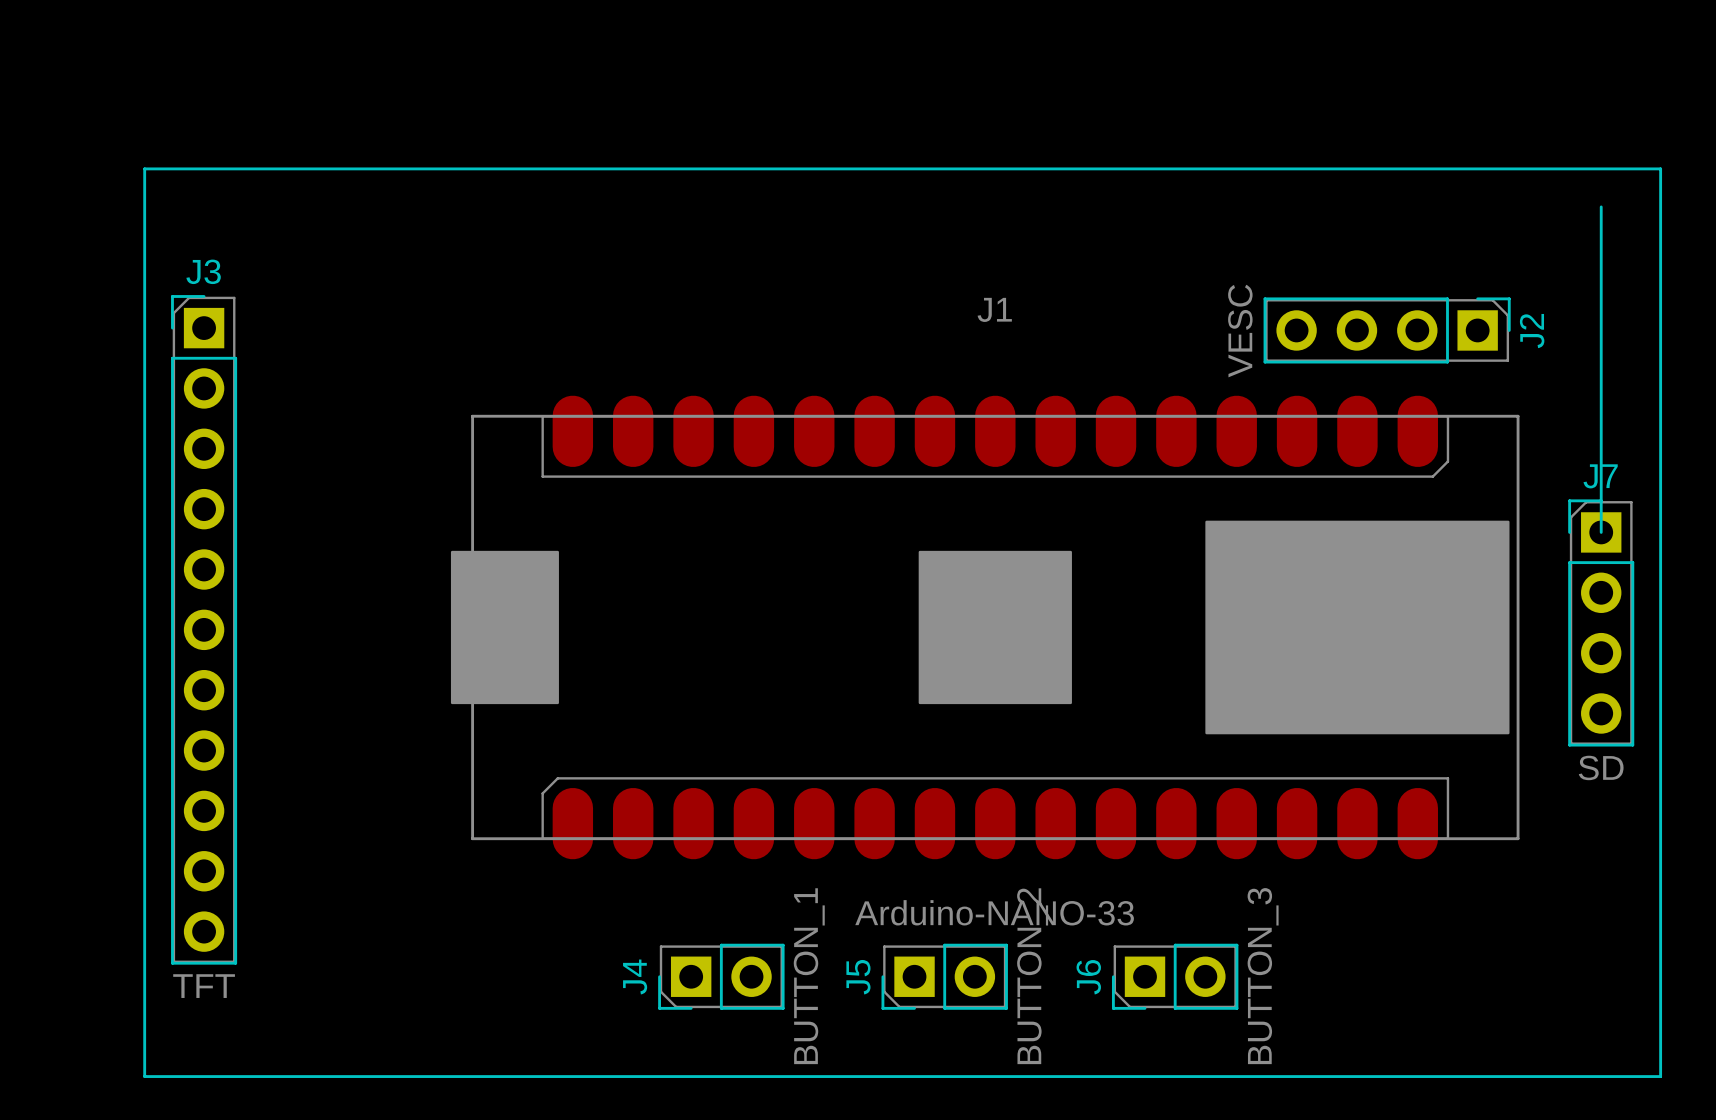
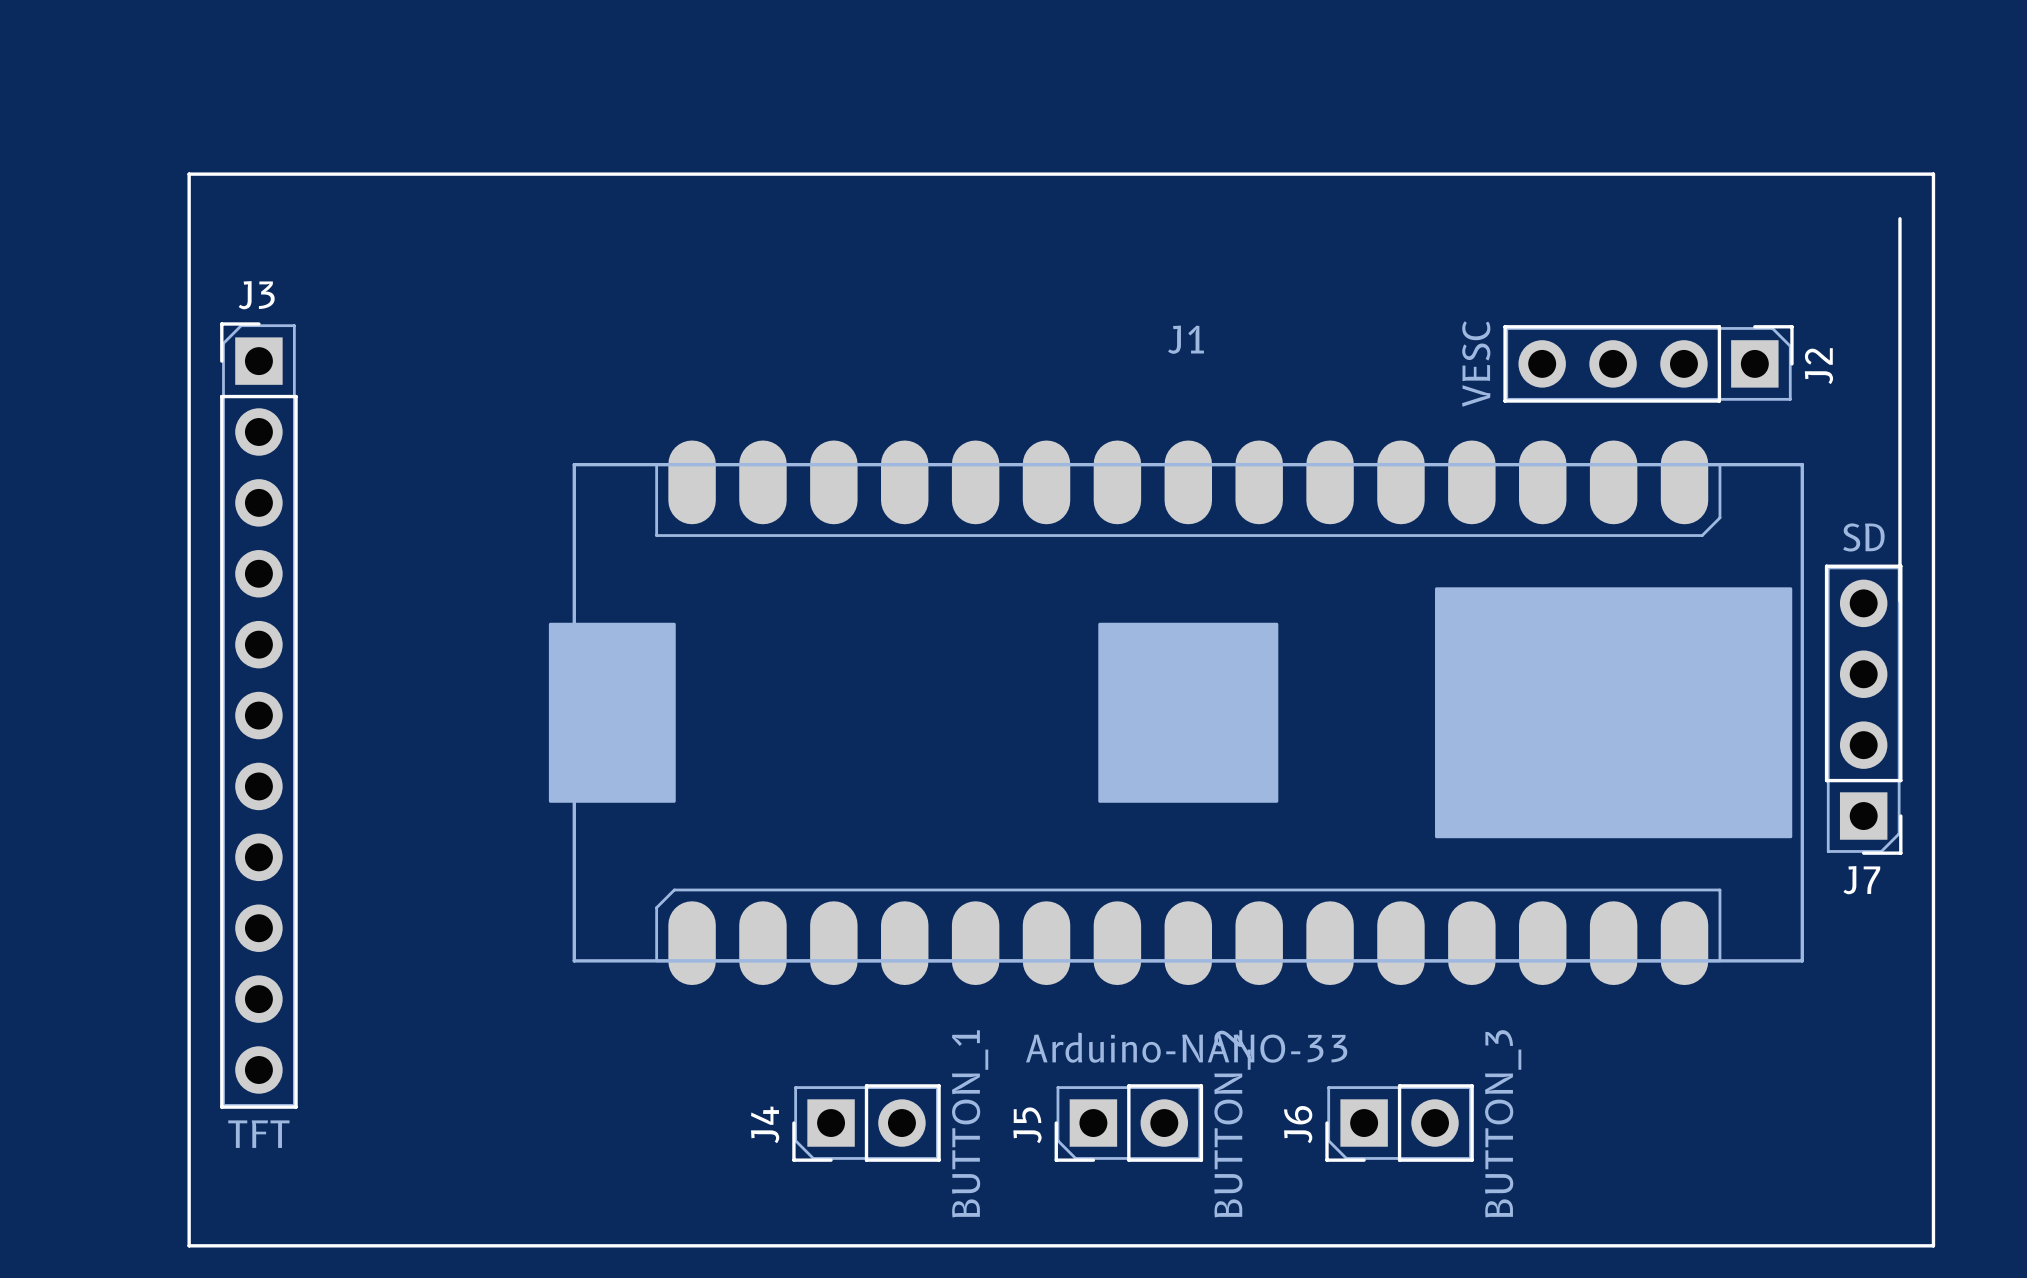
line: (1629, 168) (1660, 168) (1660, 1076) (144, 1076) -> (1933, 174) (1933, 1245) (189, 1245) (189, 1240)
J7 rotation: 0° (1601, 622) -> 180° (1863, 709)

